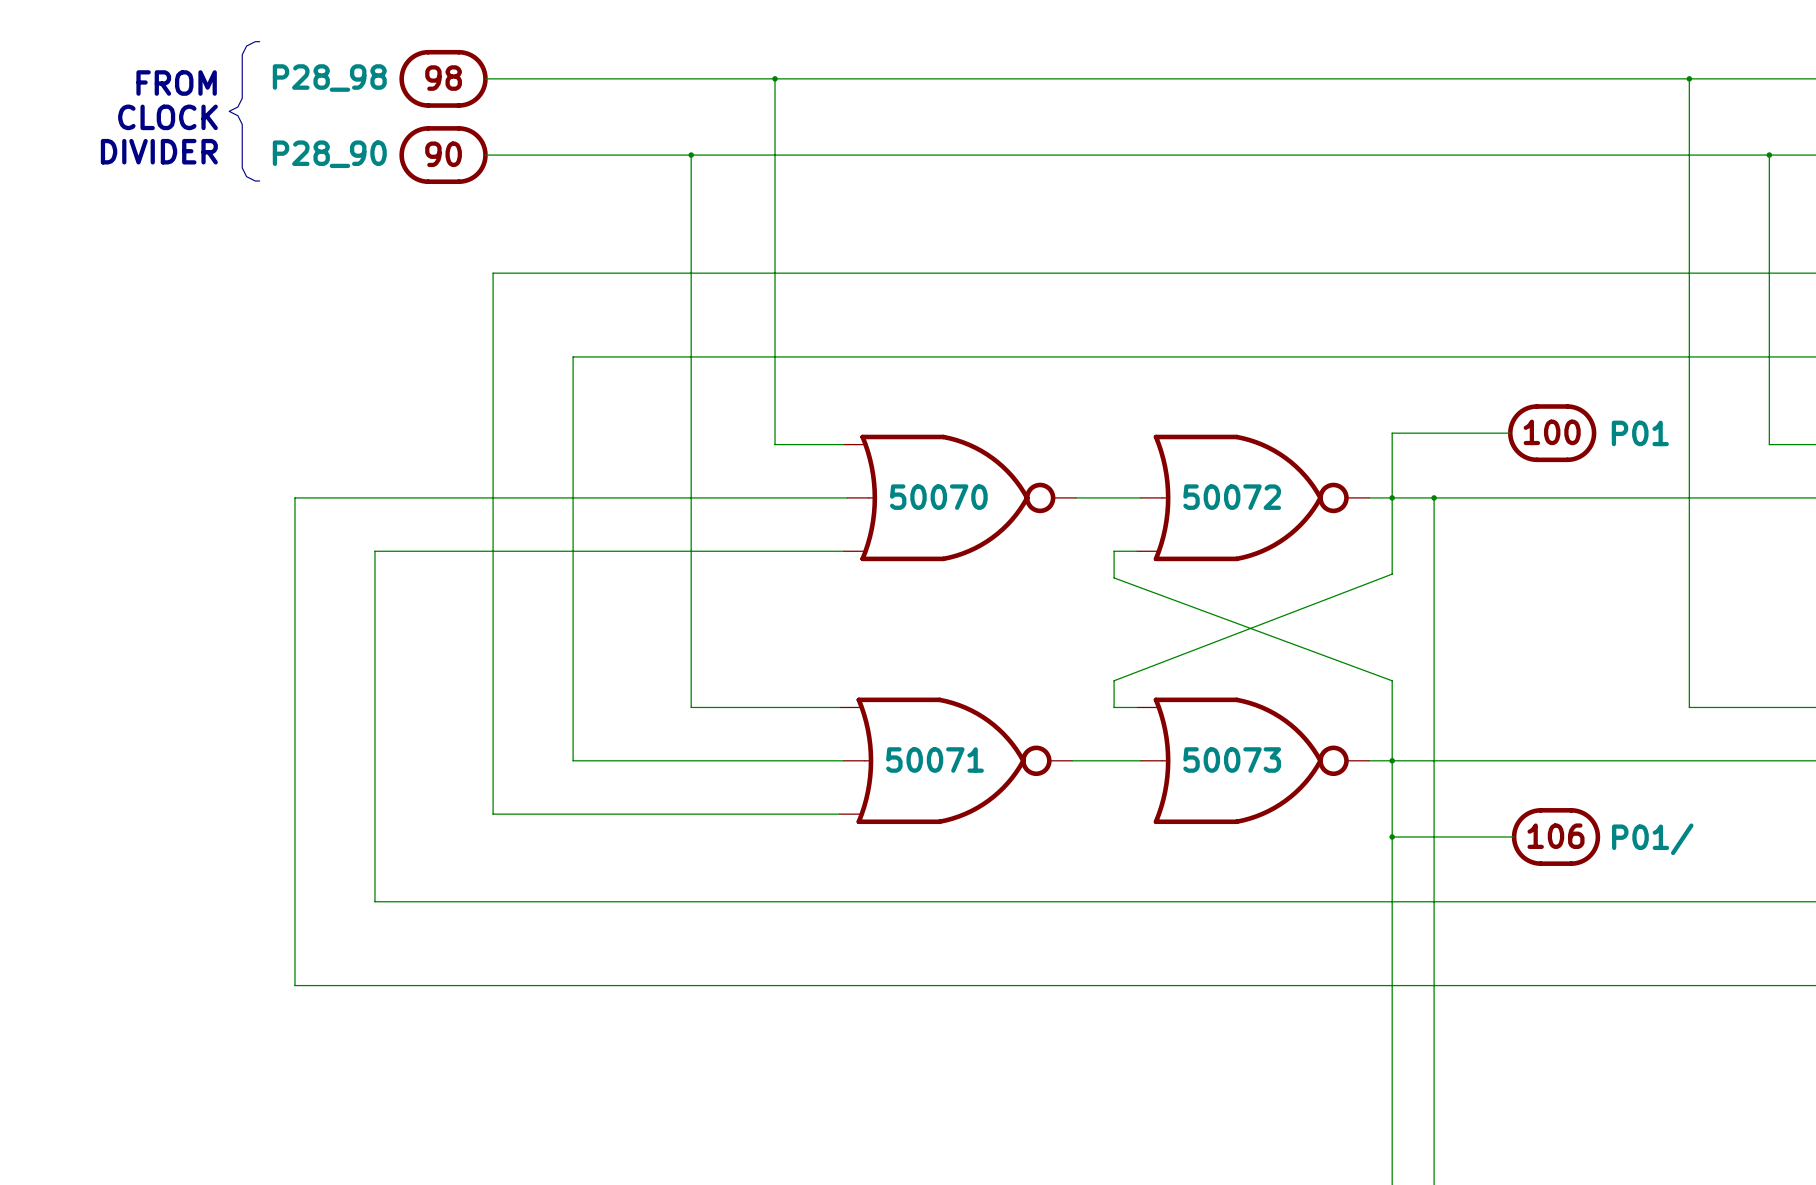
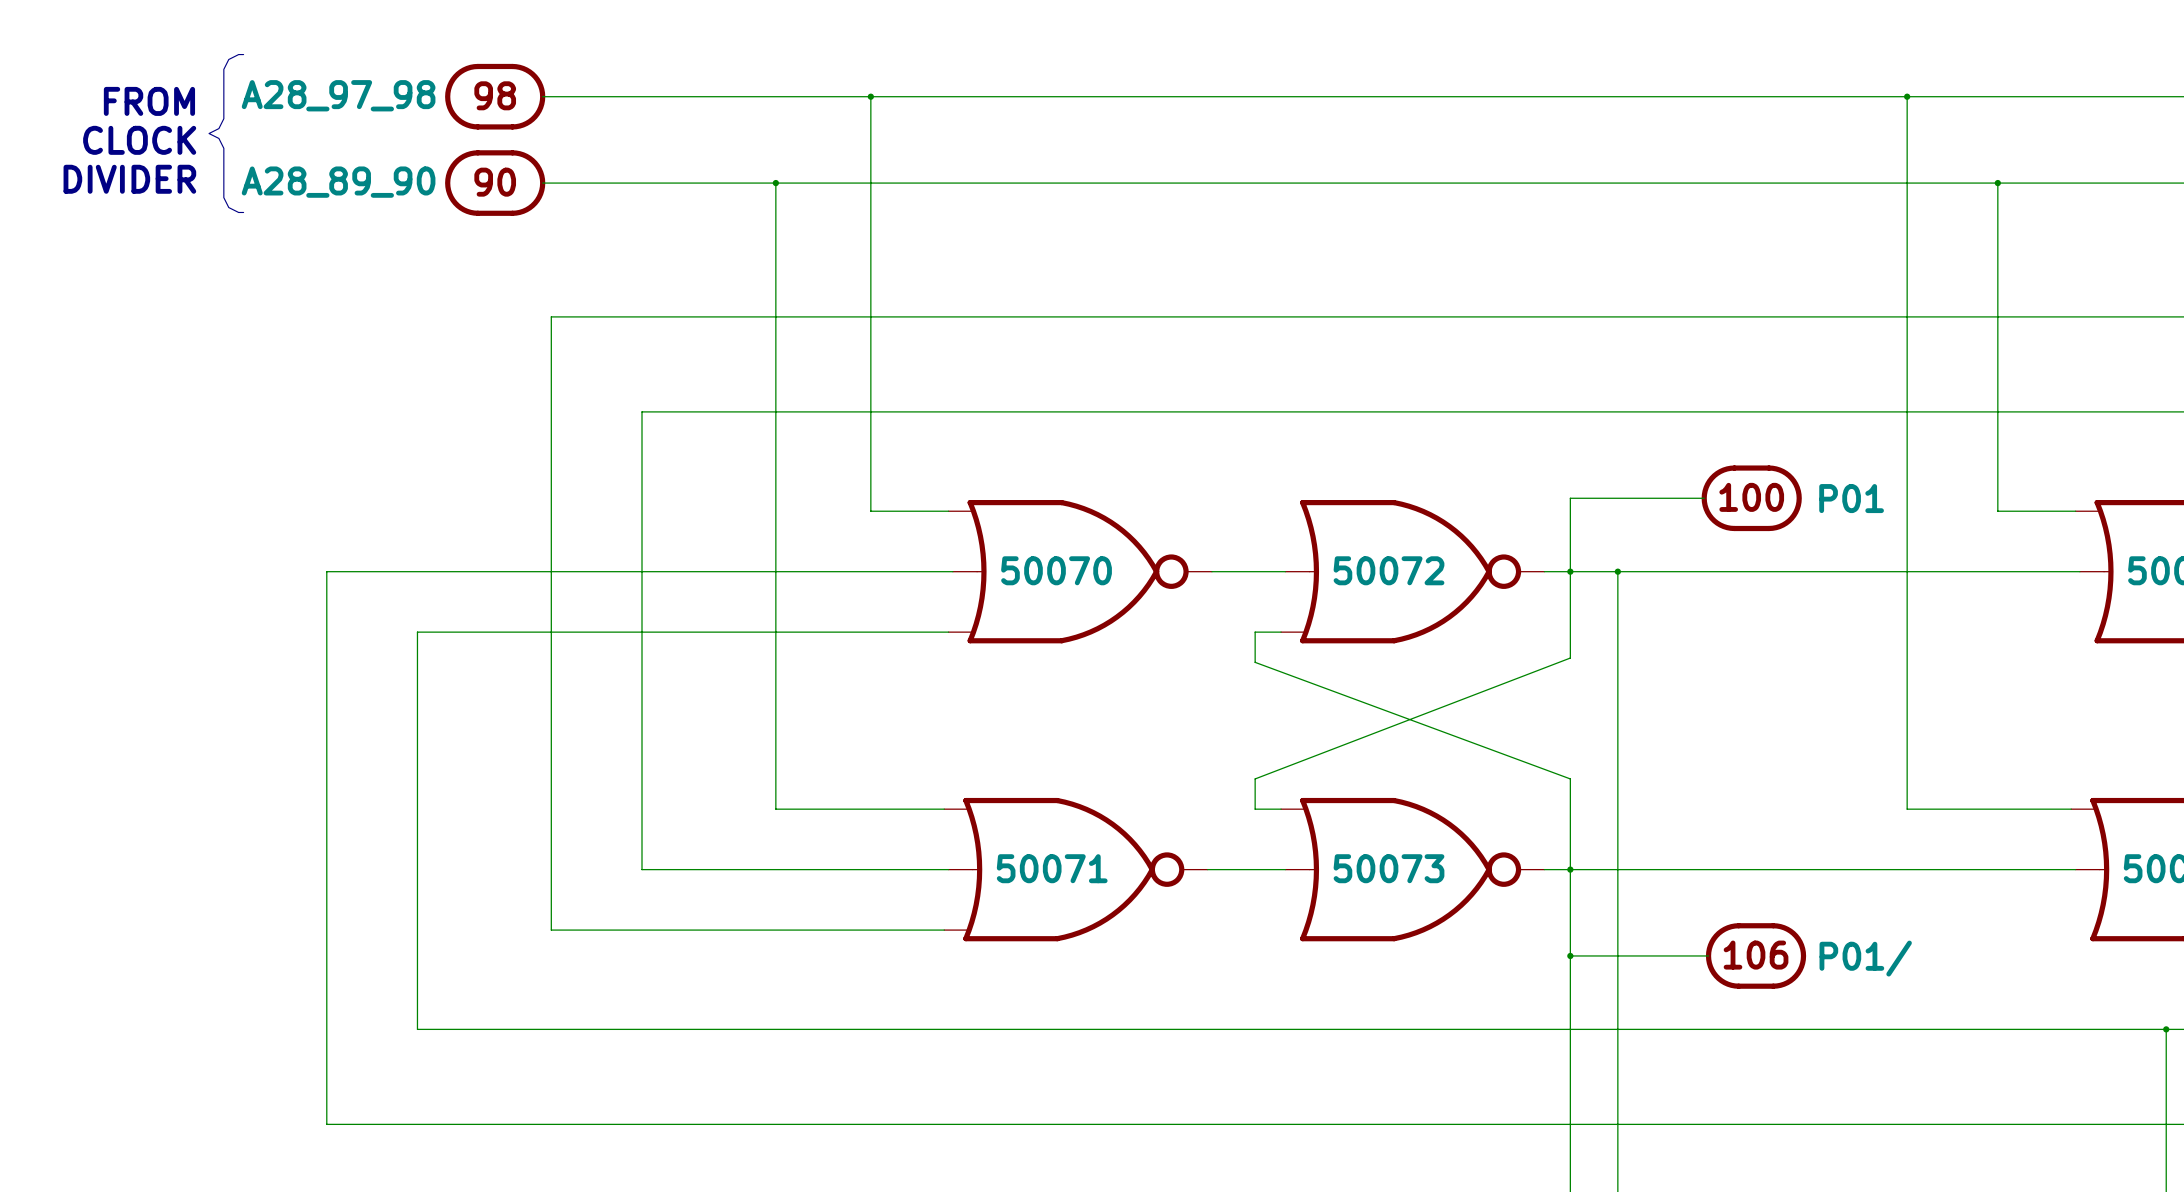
part text: P28_98 (329, 78) -> A28_97_98 (338, 95)
text position: FROM (176, 83) -> FROM (149, 101)
text position: { (244, 111) -> { (226, 133)
text position: CLOCK (167, 117) -> CLOCK (139, 140)
text position: DIVIDER (159, 151) -> DIVIDER (129, 179)
part text: P28_90 (329, 154) -> A28_89_90 (338, 182)

